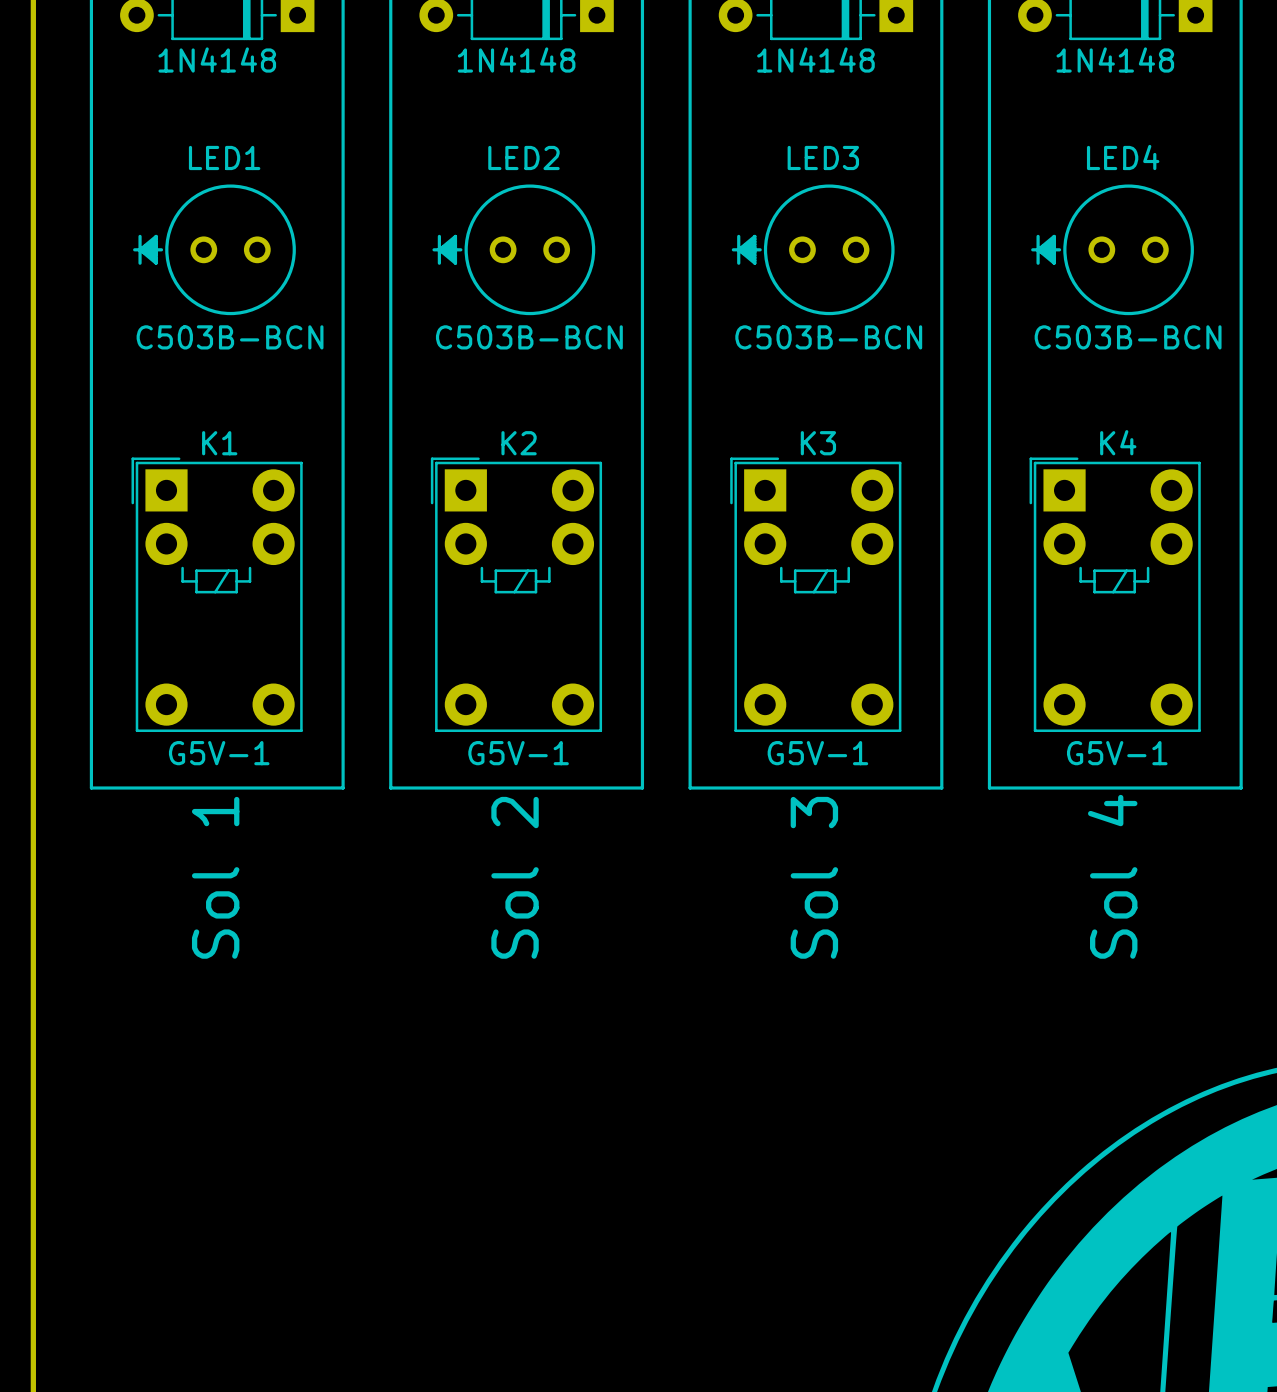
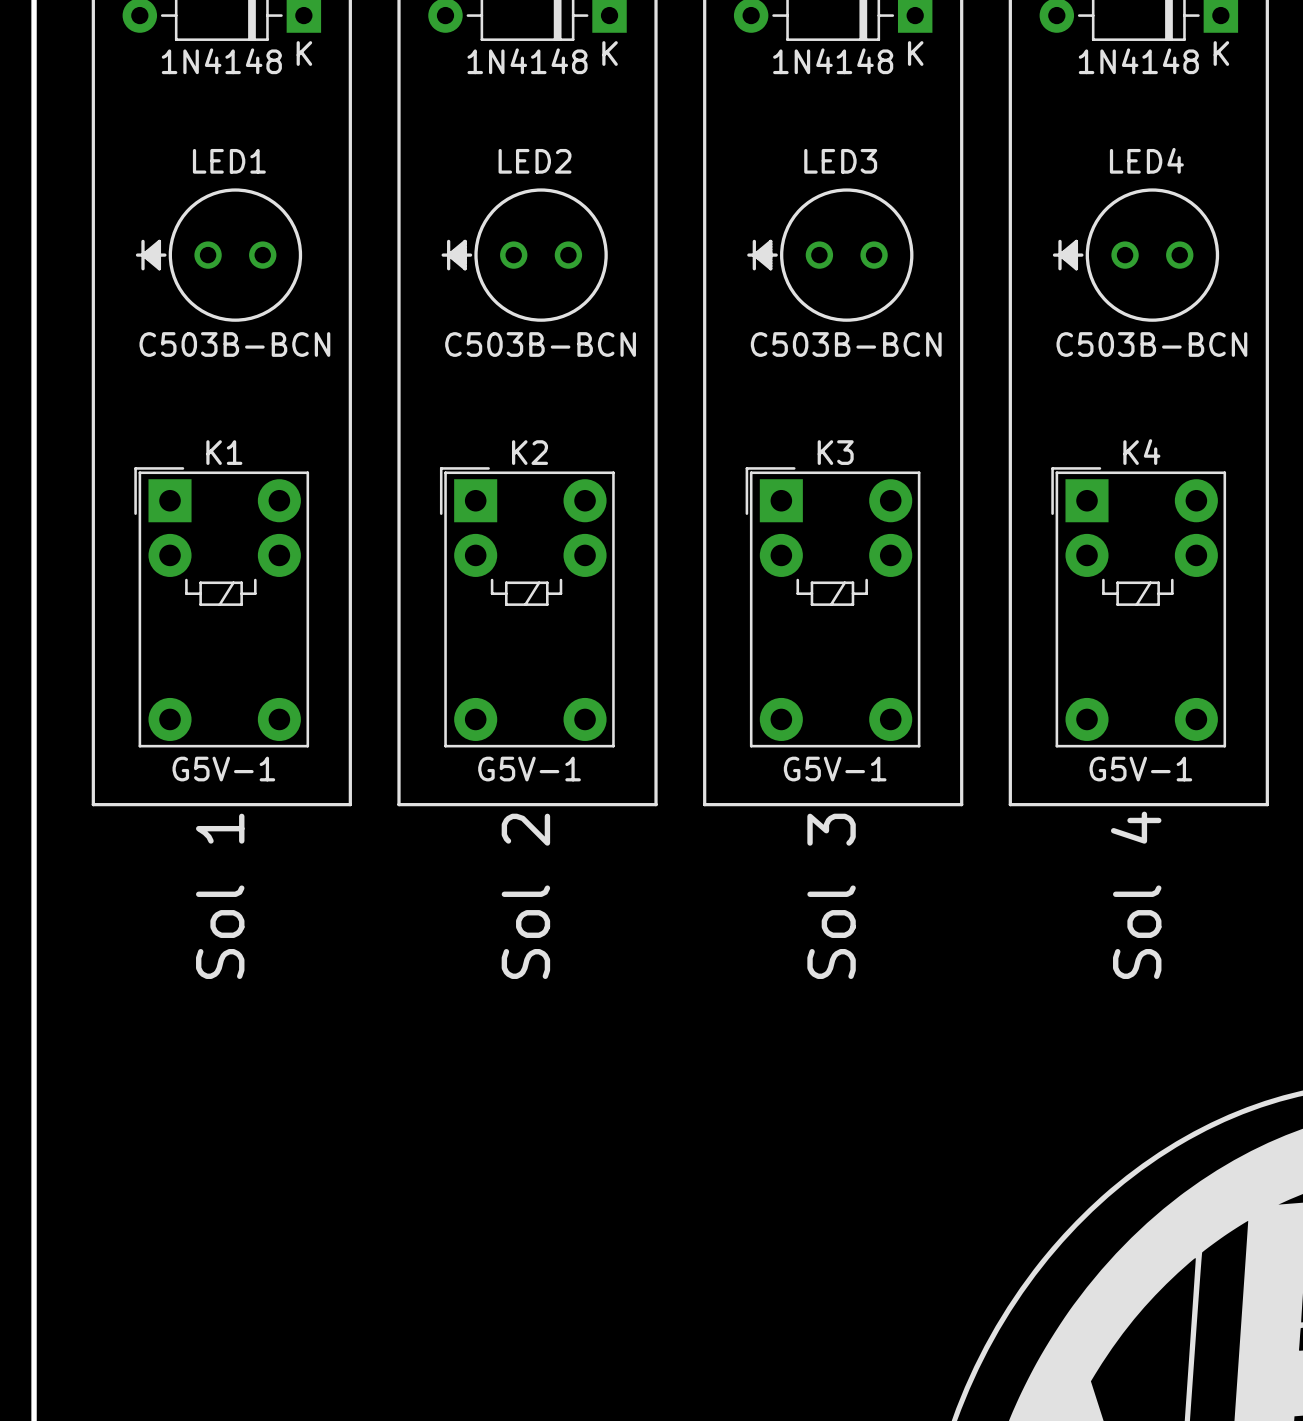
part text: none -> K (304, 53)
part text: none -> K (610, 53)
part text: none -> K (915, 53)
part text: none -> K (1221, 53)

